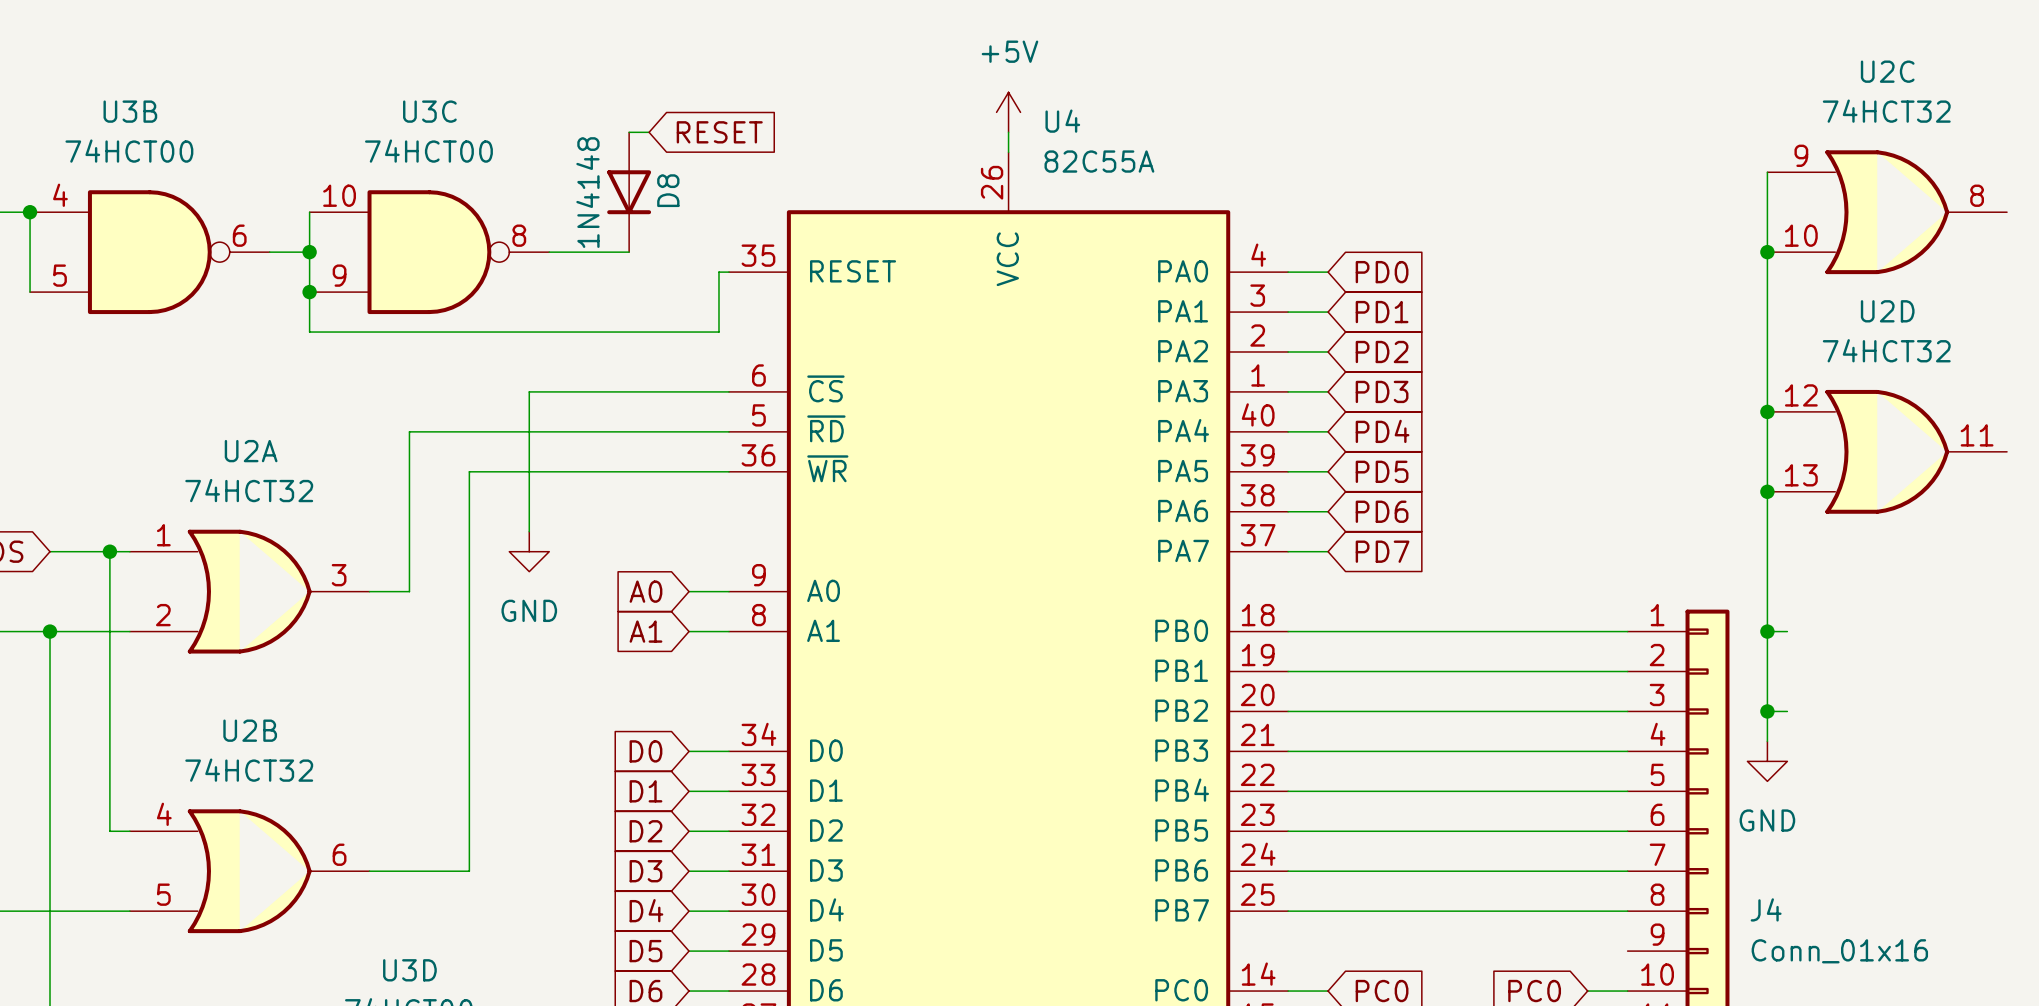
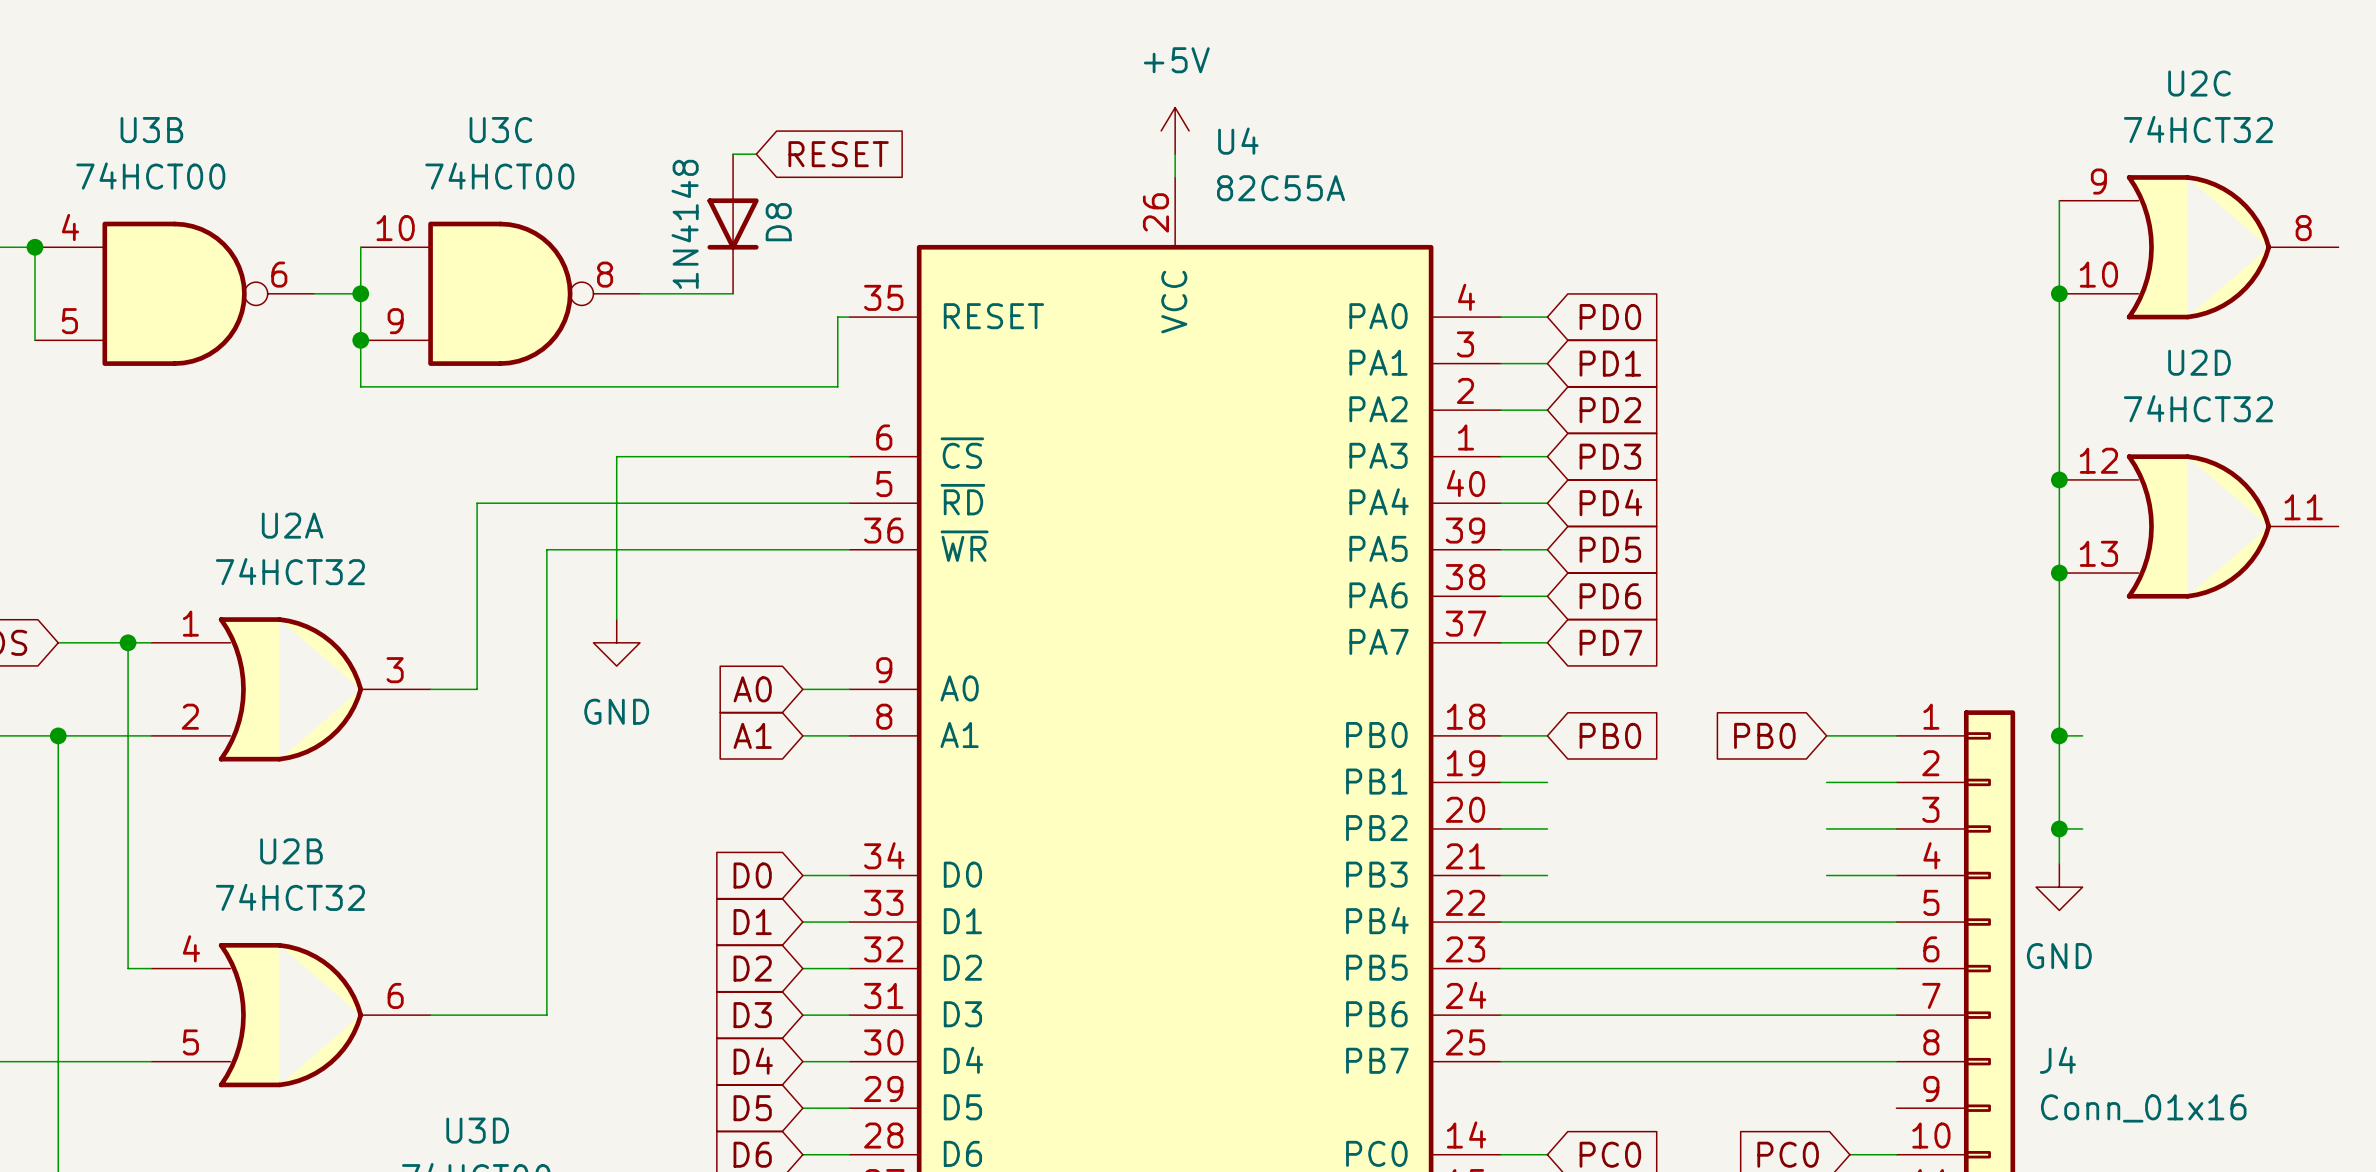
wire: (1328, 631) (1567, 631) -> none
global label: none -> PB0 (1610, 735)
global label: none -> PB0 (1764, 735)
wire: (1328, 671) (1567, 671) -> none
wire: (1328, 711) (1567, 711) -> none
wire: (1328, 751) (1567, 751) -> none

